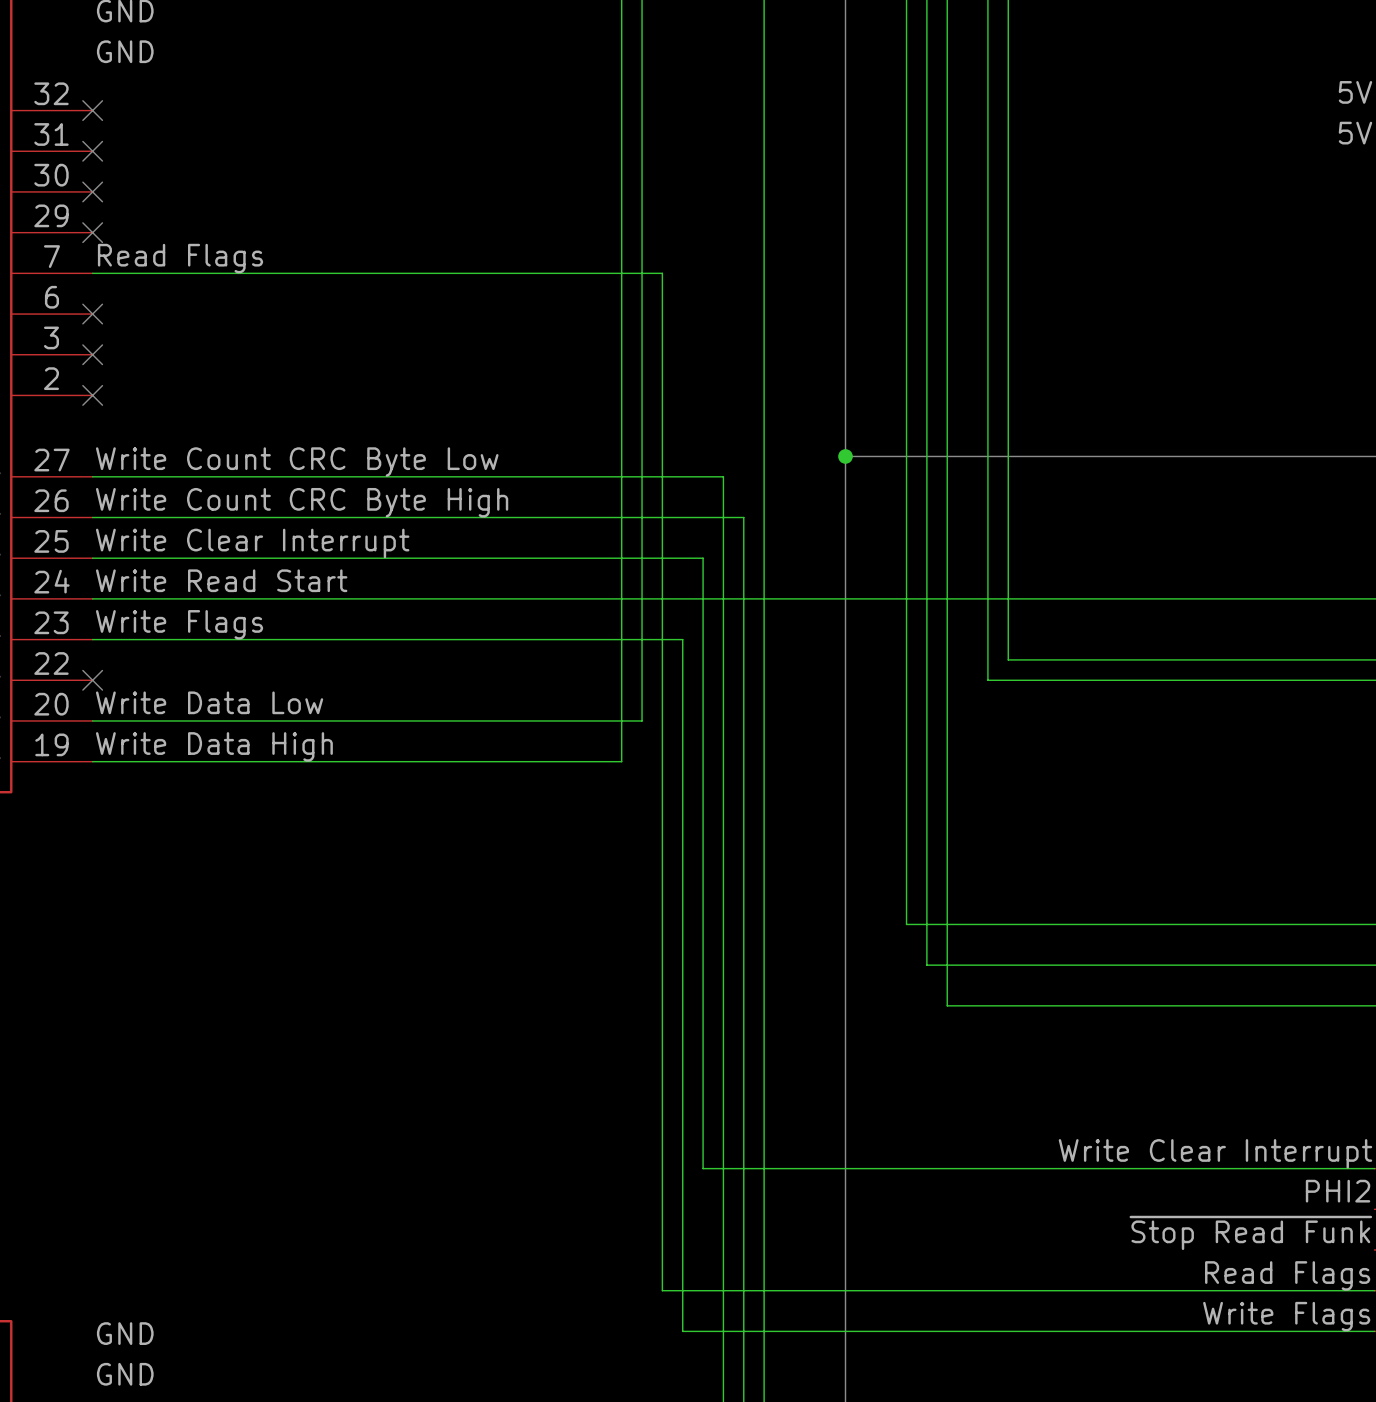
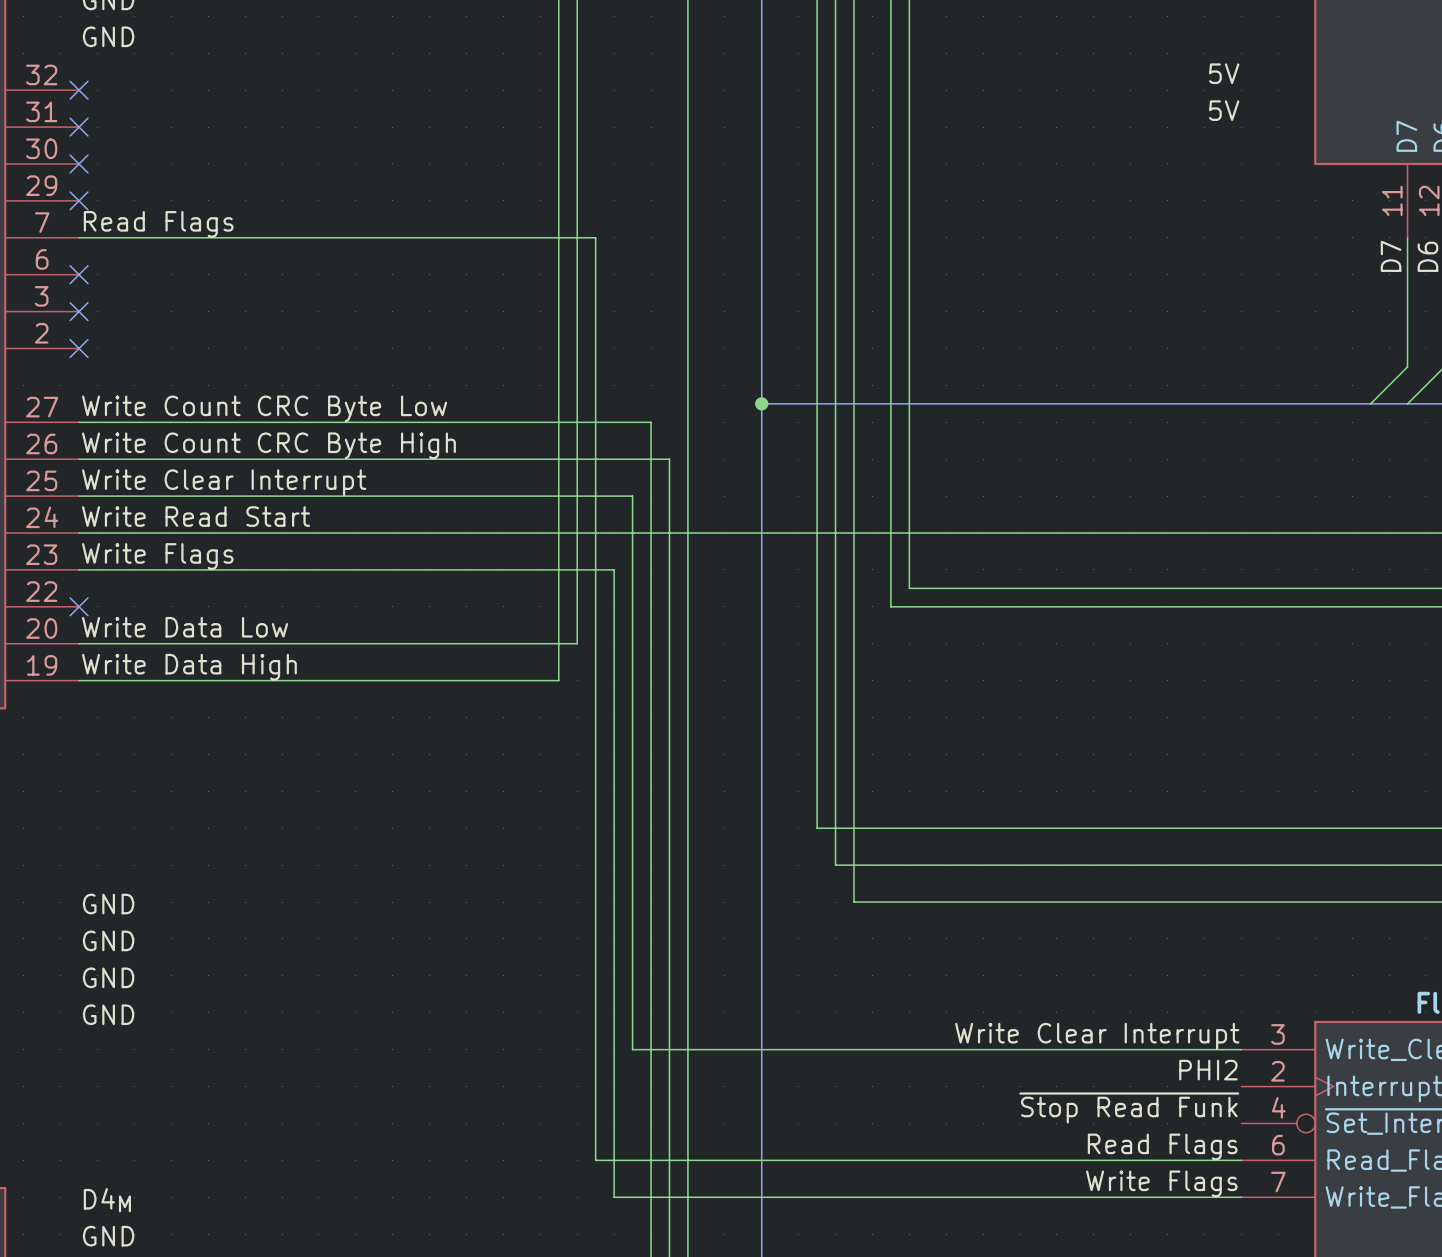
label: none -> GND (108, 904)
label: none -> GND (108, 940)
label: none -> GND (108, 977)
label: none -> GND (108, 1014)
label: GND (125, 1333) -> D4M (107, 1200)

